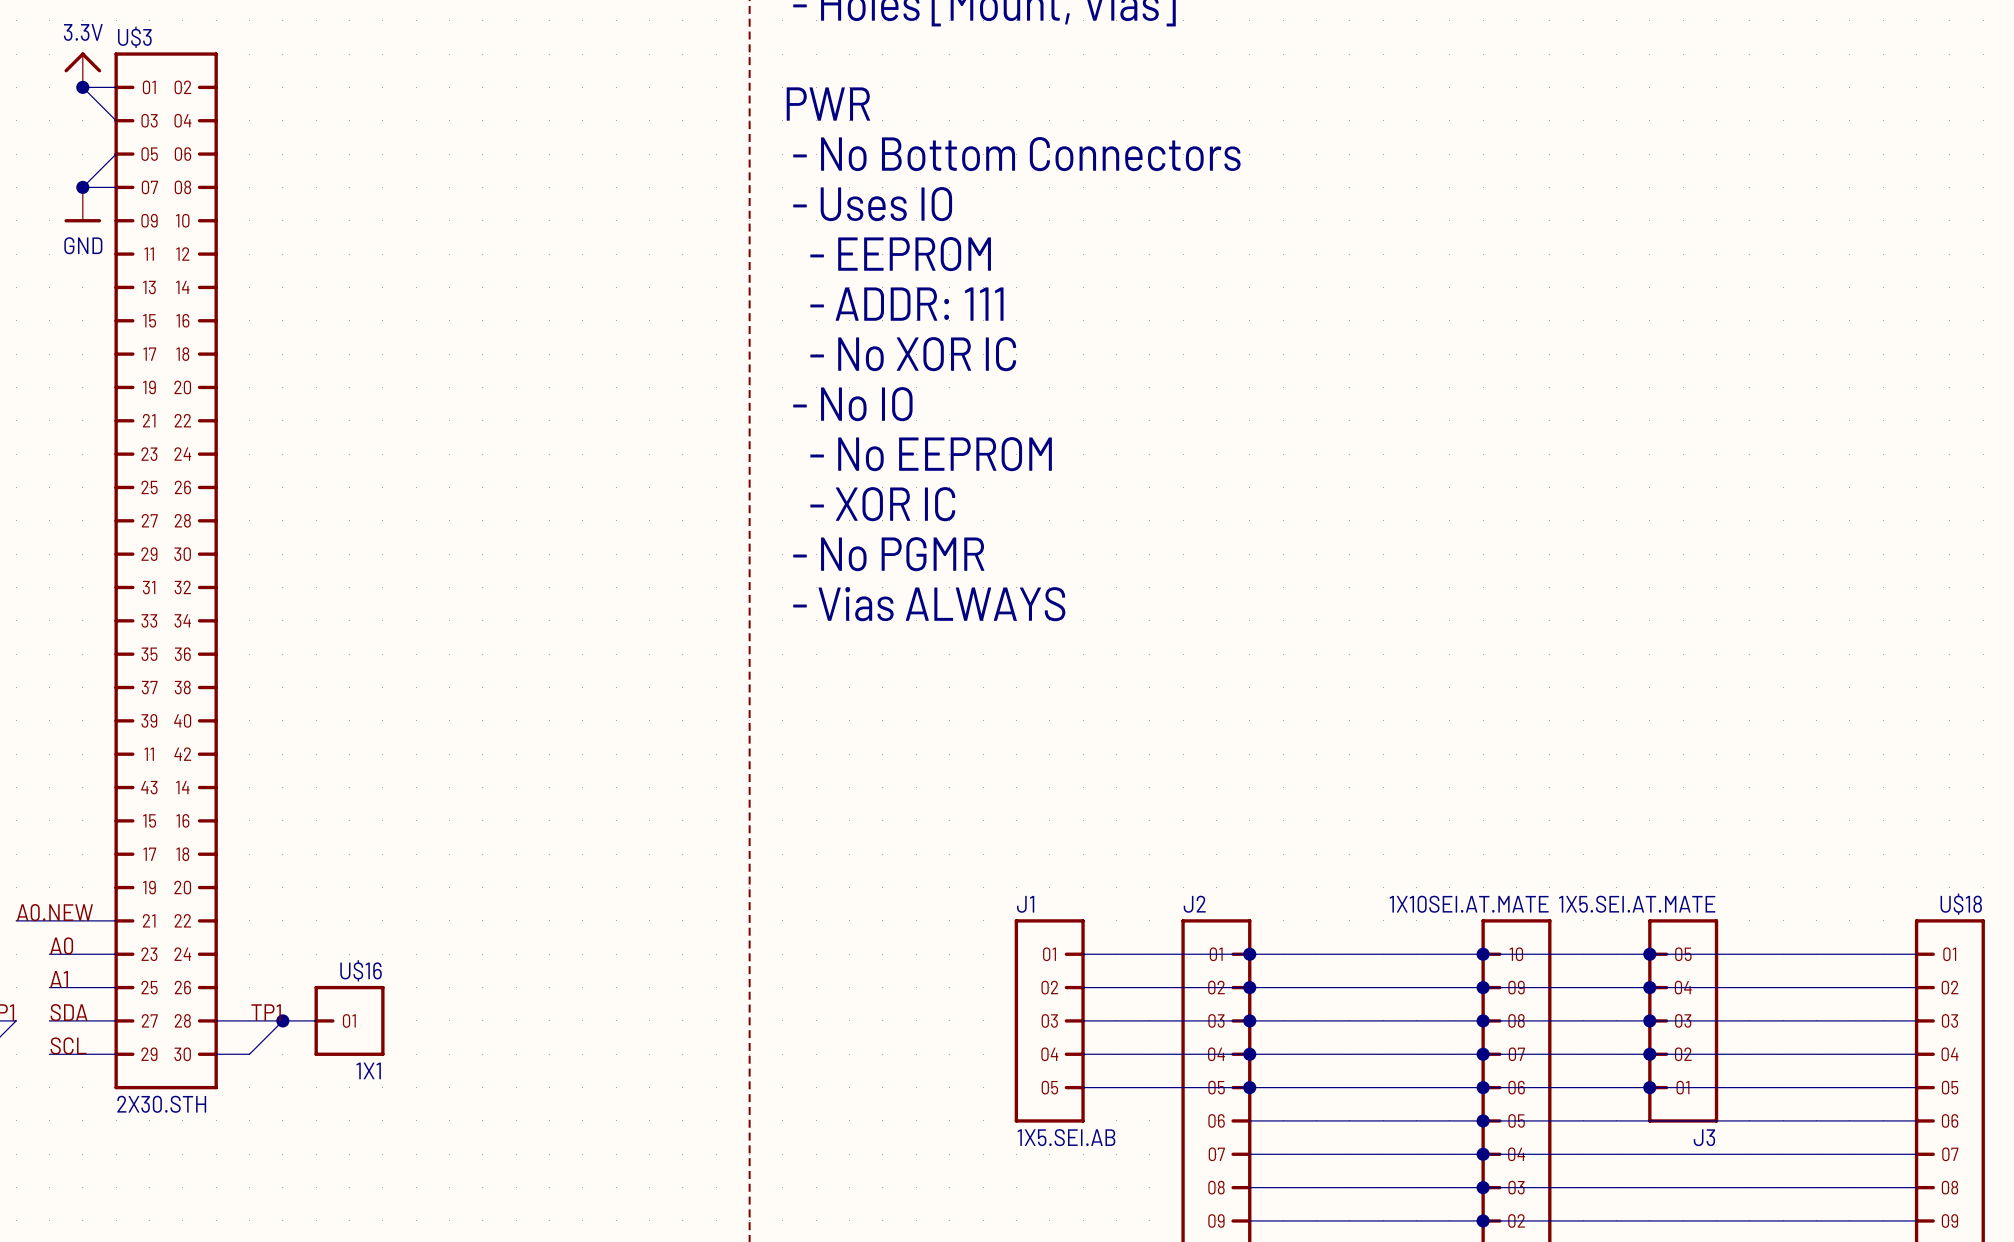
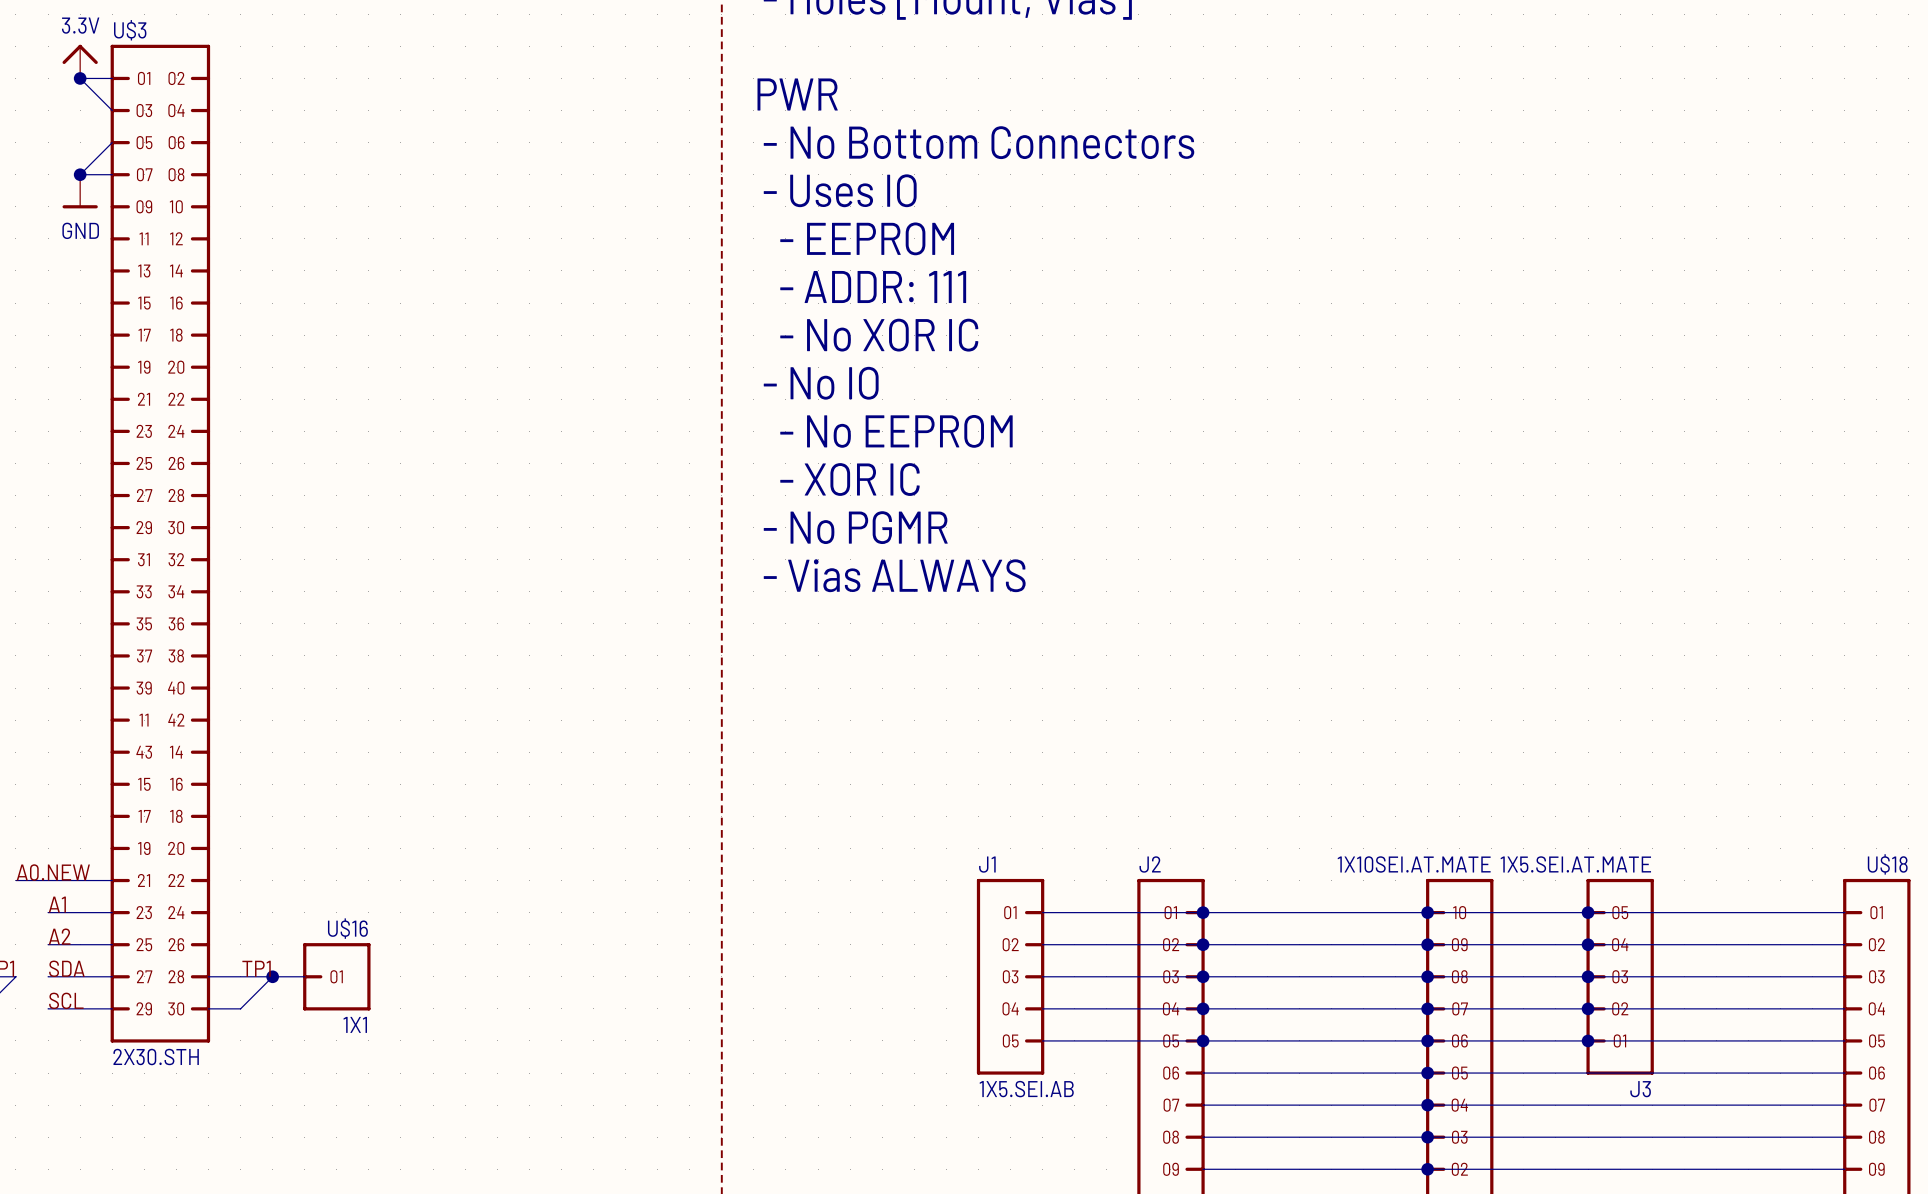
label: A0 (61, 945) -> A1 (57, 904)
label: A1 (59, 979) -> A2 (59, 936)

